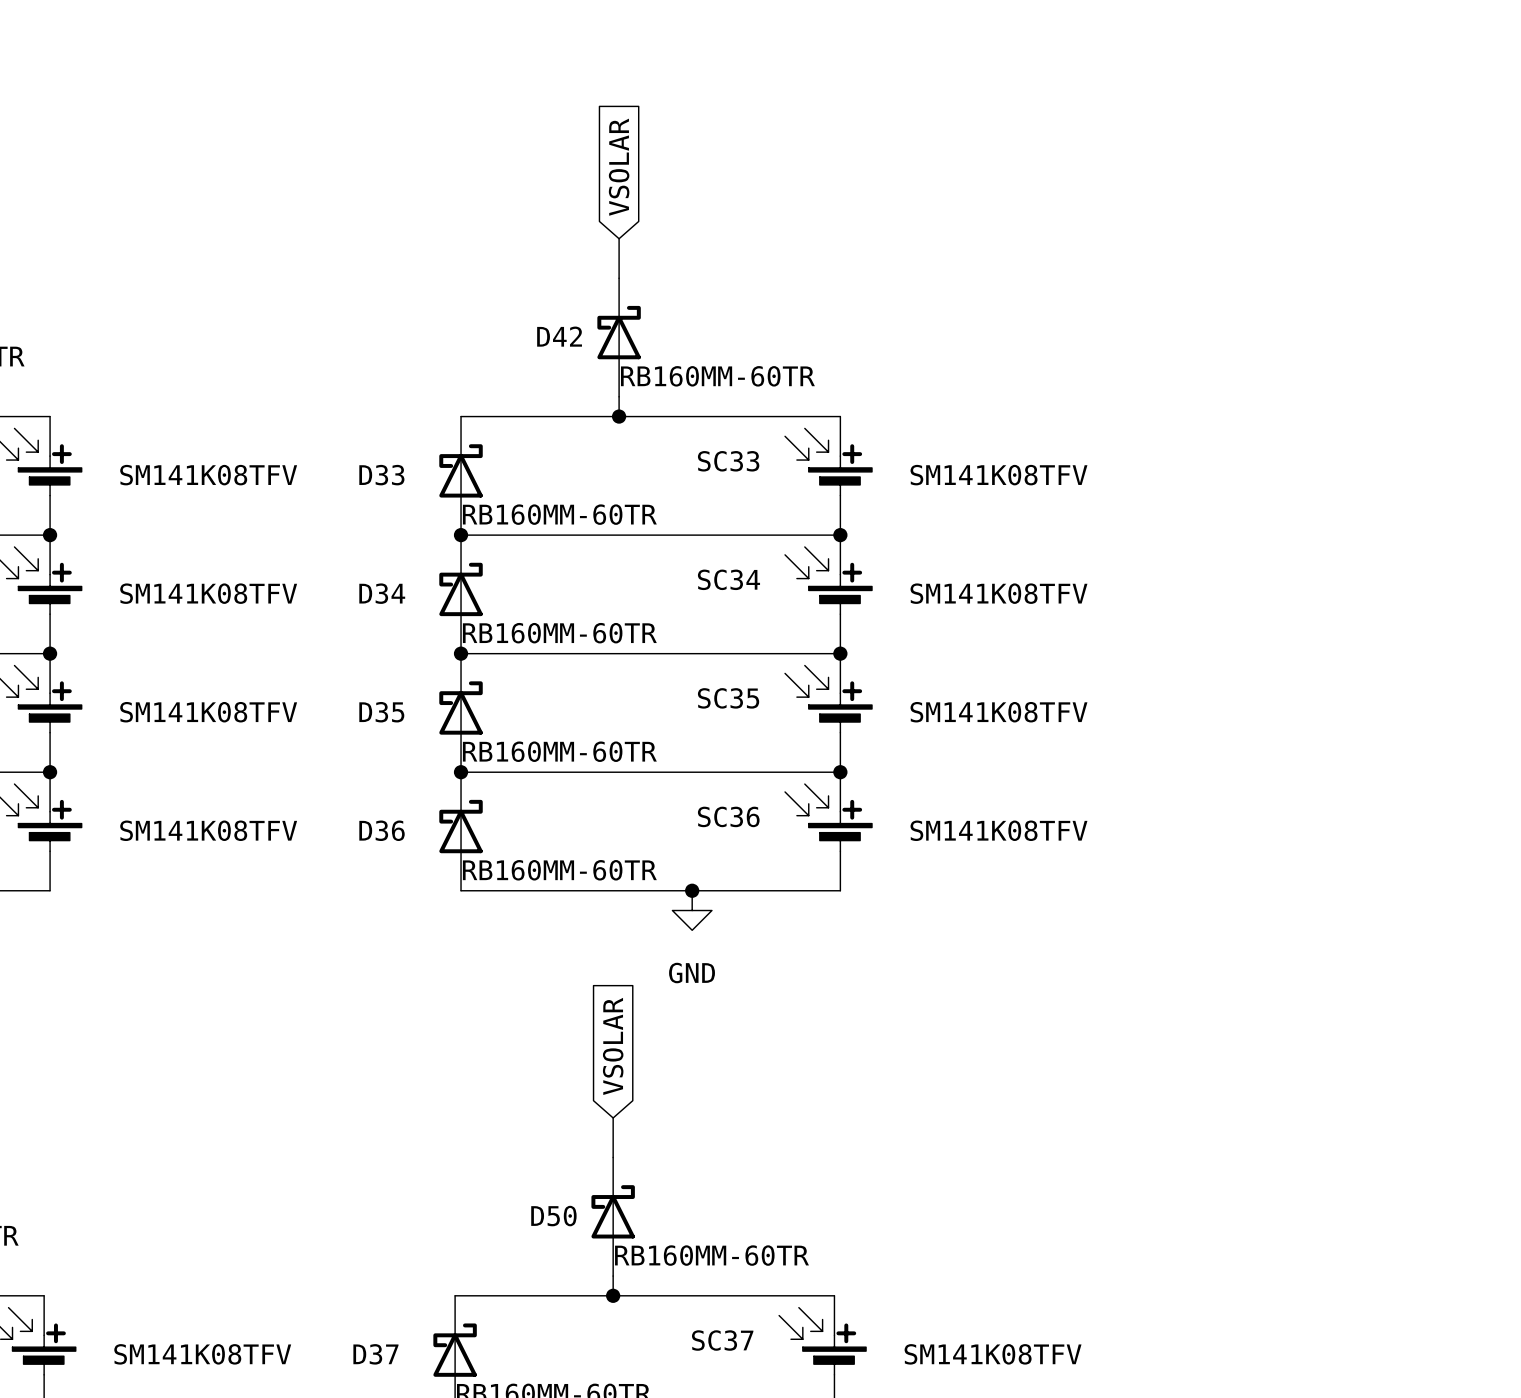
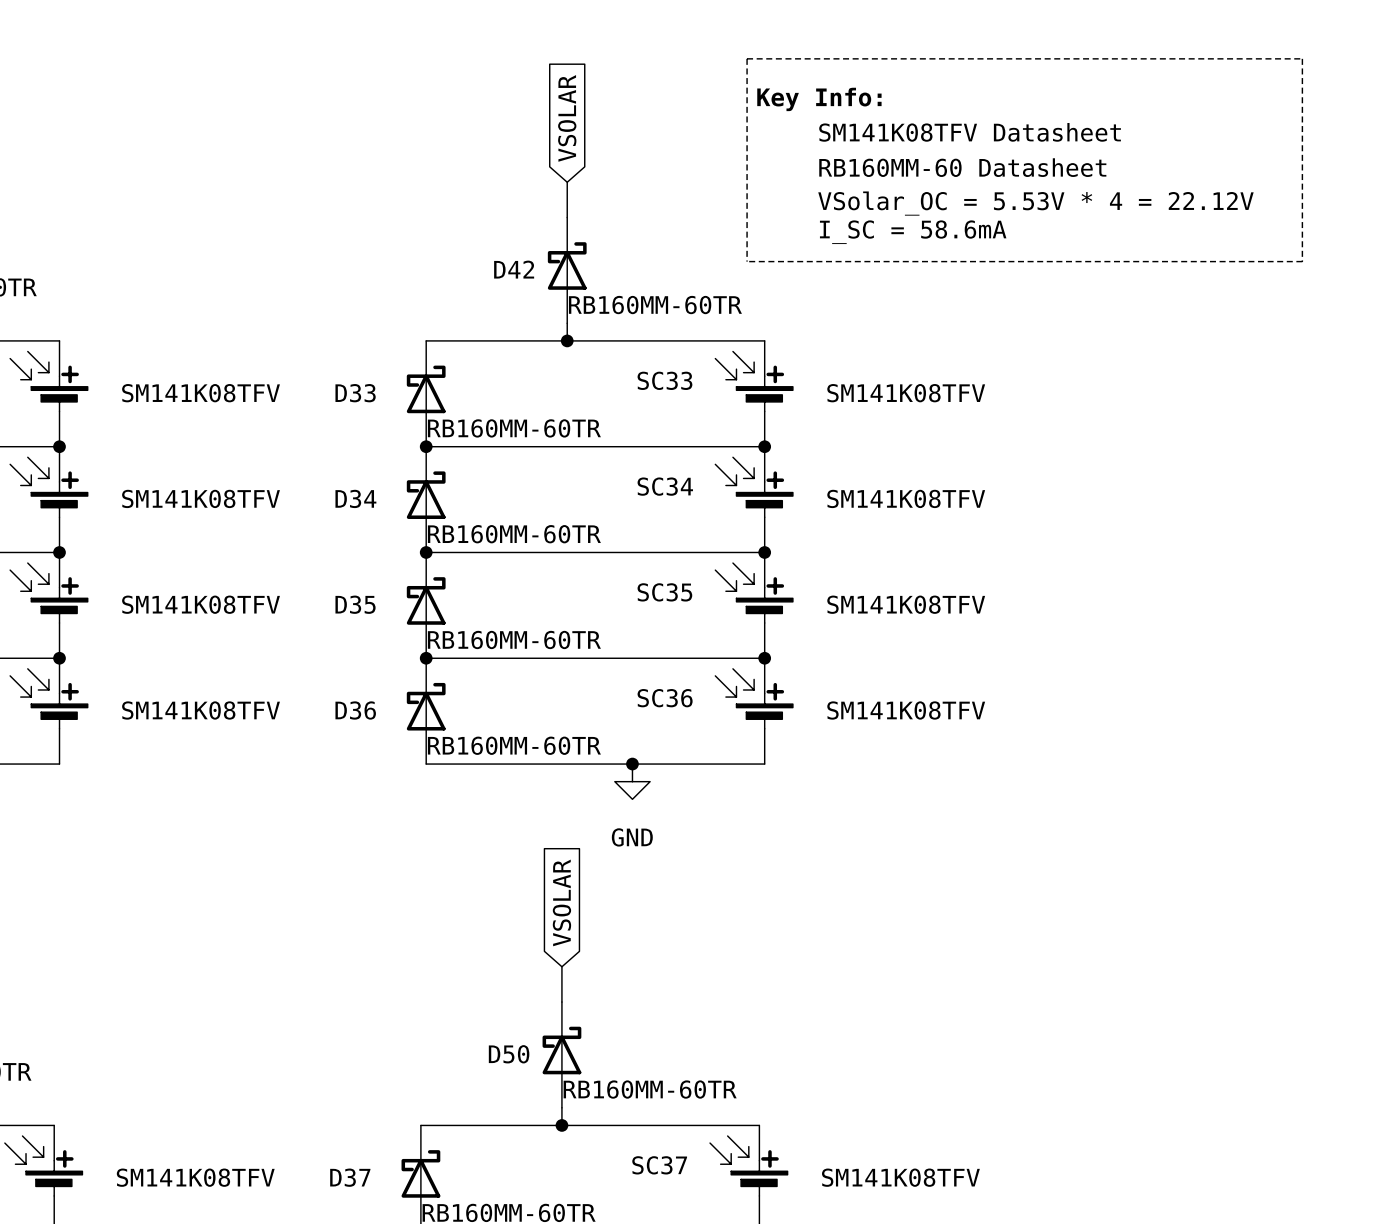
line: none -> (747, 58) (747, 261) (1302, 261) (1302, 58) (747, 58)
text: none -> Key Info: (819, 99)
text: none -> SM141K08TFV Datasheet (970, 132)
text: none -> RB160MM-60 Datasheet (962, 167)
text: none -> VSolar_OC = 5.53V * 4 = 22.12V (1035, 203)
text: none -> I_SC = 58.6mA (913, 232)

